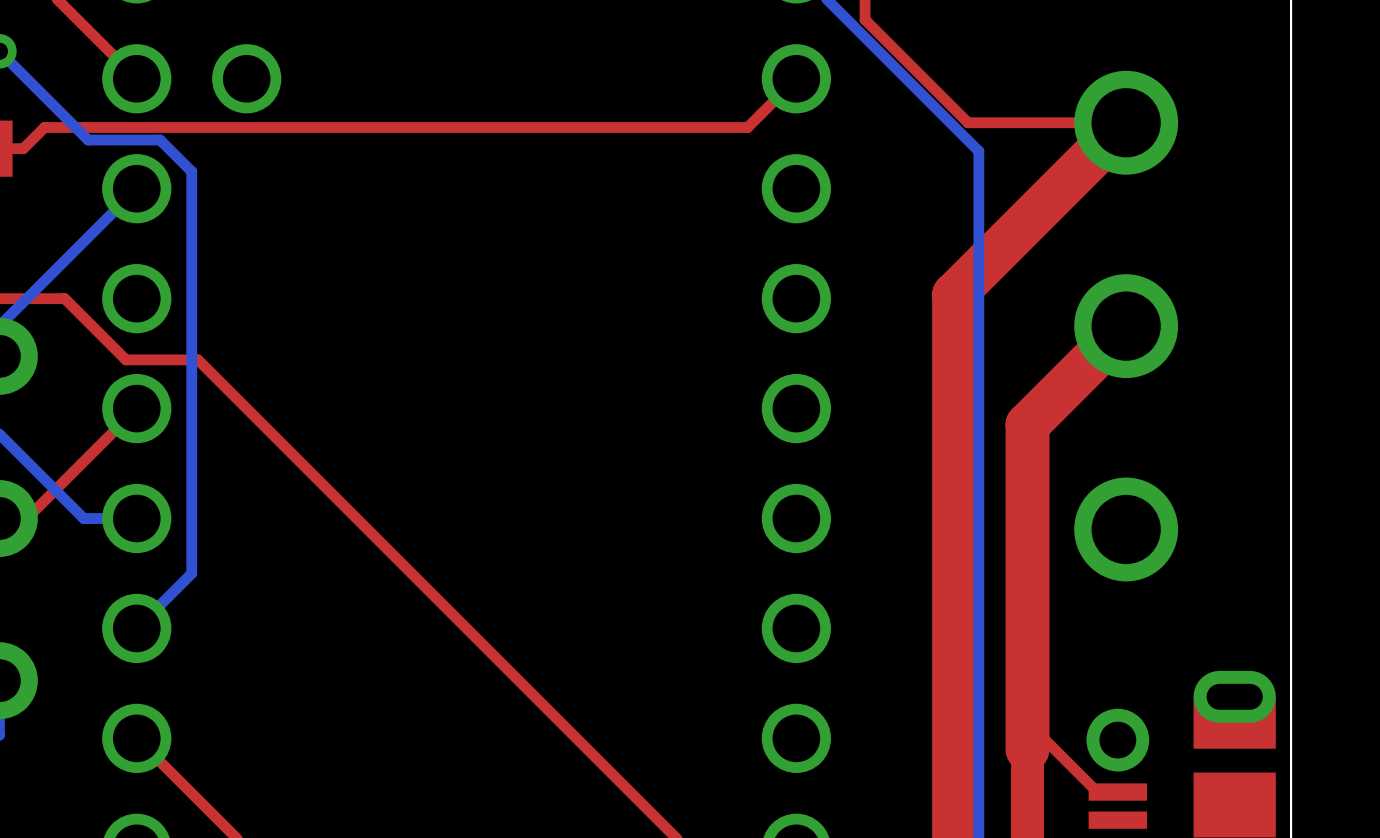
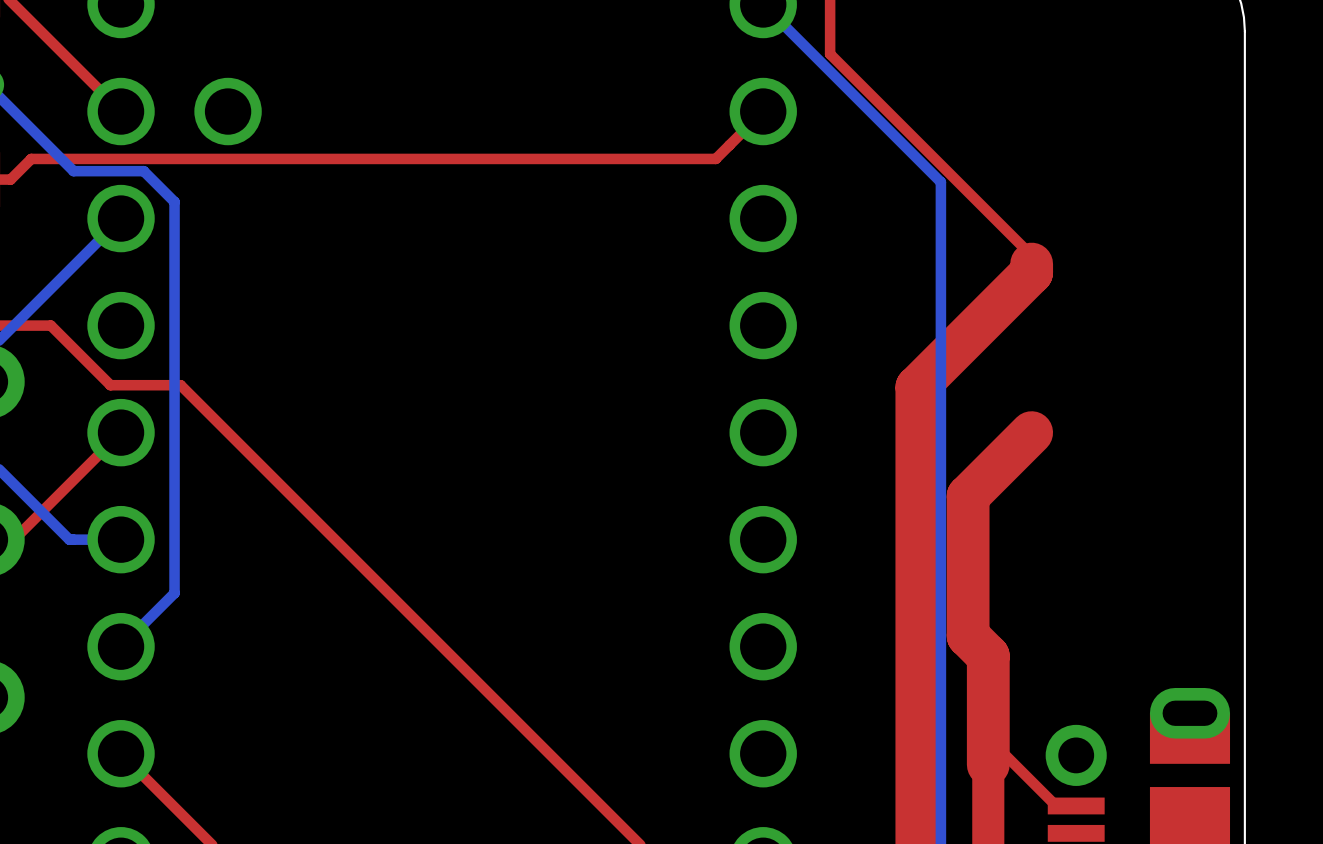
top track: (1126, 122) (968, 122) -> none
top track: (1122, 126) (954, 294) (954, 362) -> (930, 154) (1031, 255) (1031, 272) (916, 387)
top track: (1126, 326) (1027, 424) (1027, 638) -> (1031, 432) (968, 496) (968, 635) (988, 656)
part: (1126, 326) -> none

